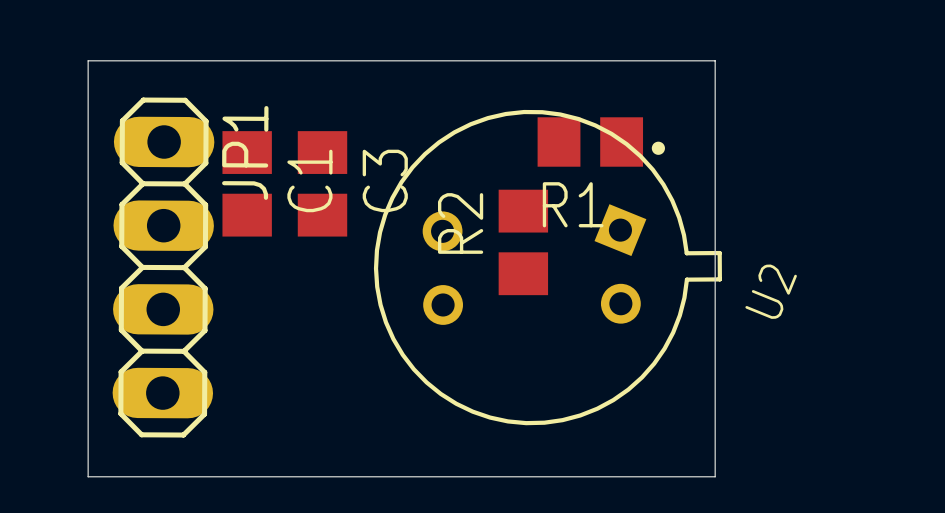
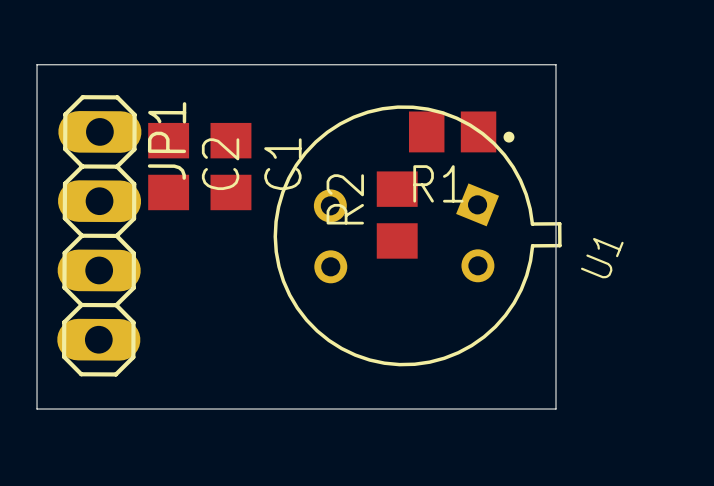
C1 name: C1 (309, 180) -> C2 (220, 164)
C3 name: C3 (385, 180) -> C1 (282, 164)
U2 name: U2 (771, 291) -> U1 (602, 258)

